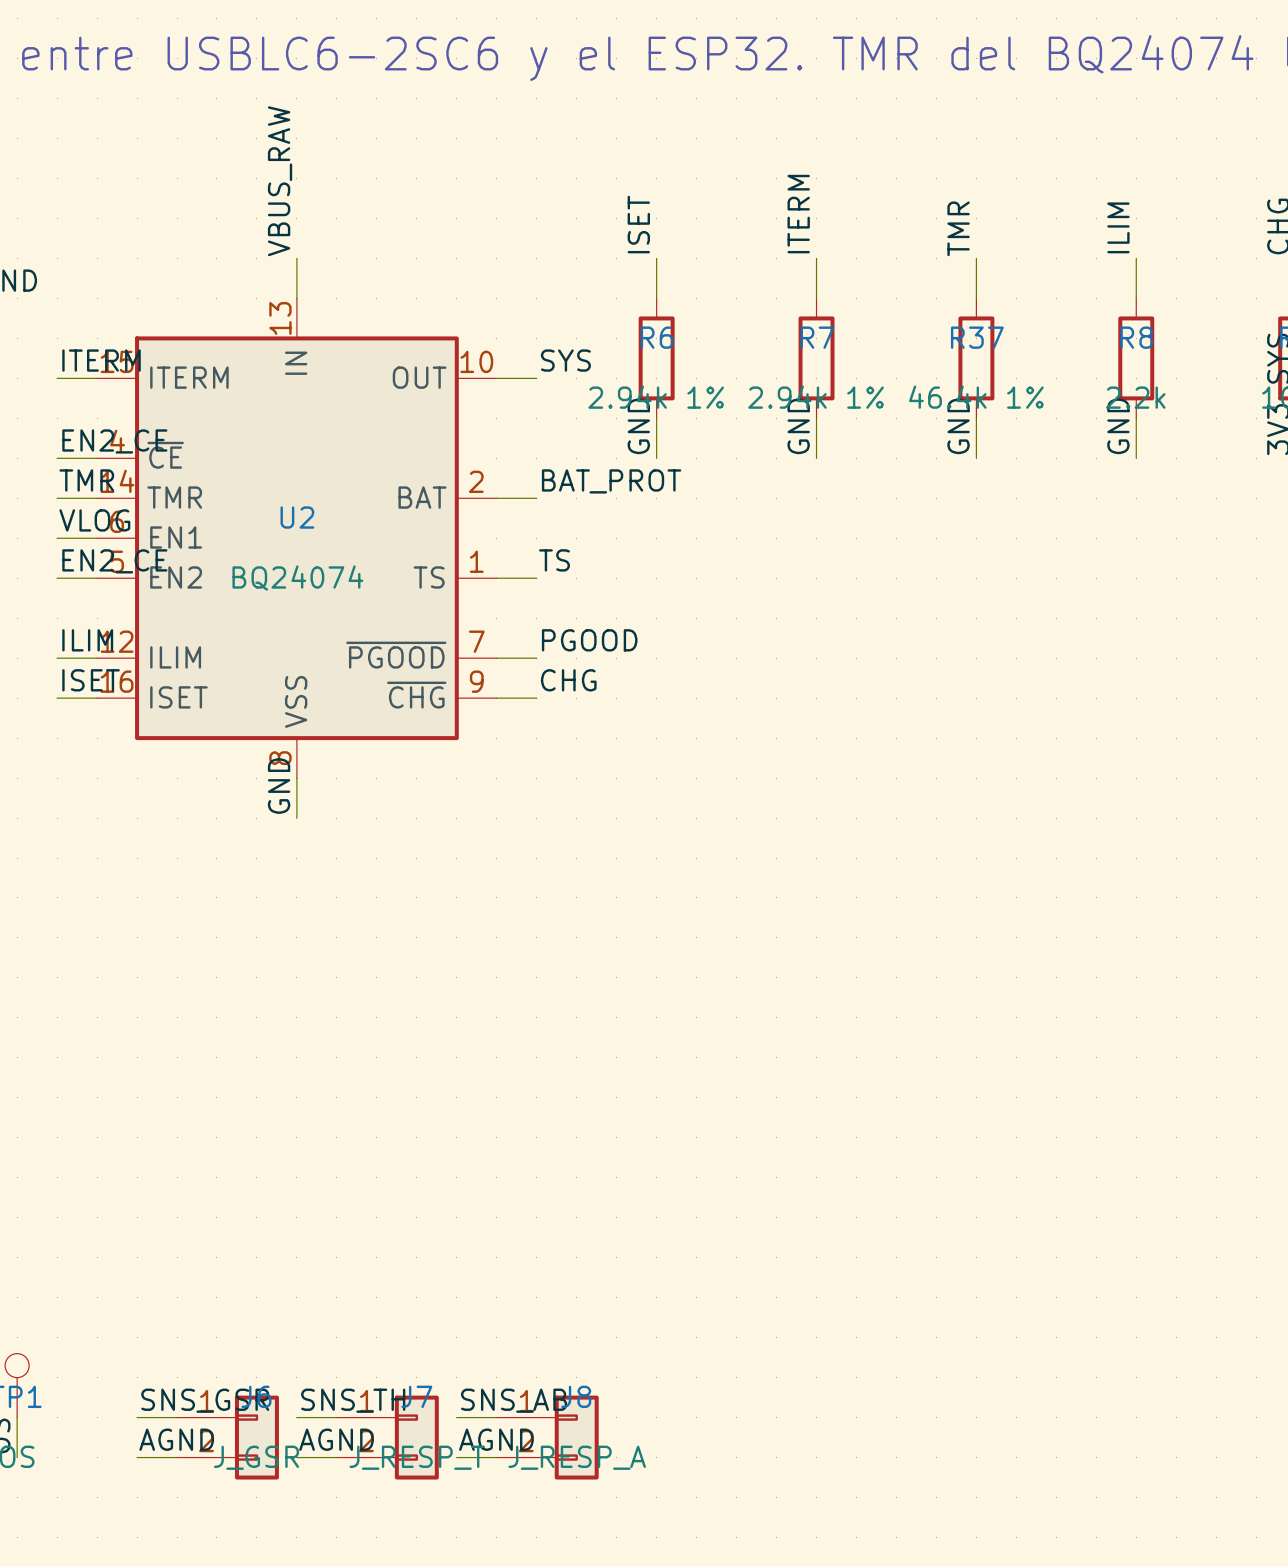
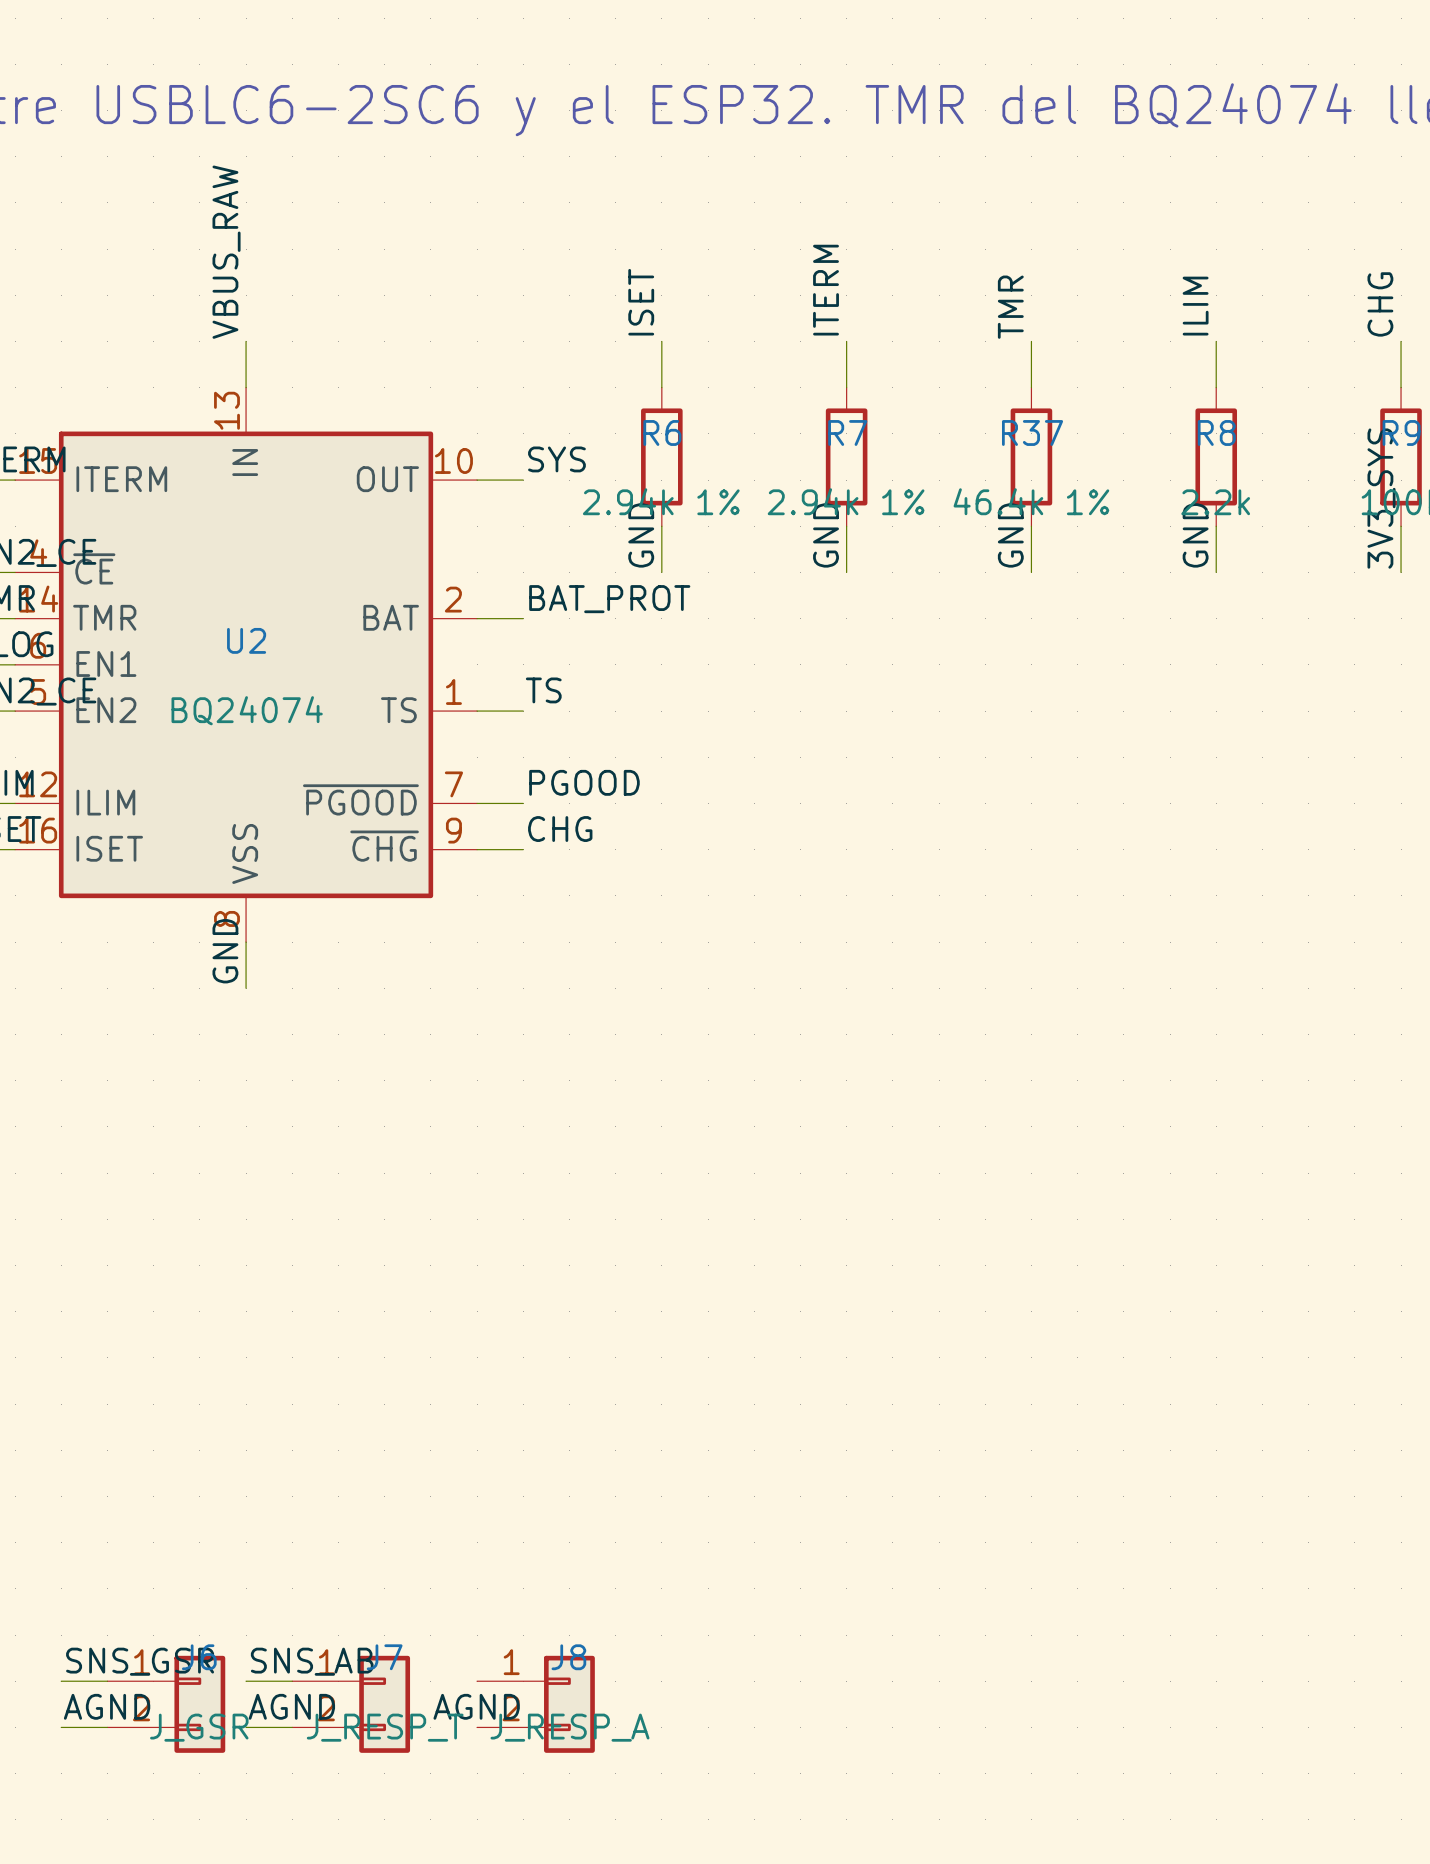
label: SNS_TH (353, 1400) -> SNS_AB (312, 1661)
label: SNS_AB (514, 1400) -> none
wire: (456, 1417) (496, 1417) -> none
wire: (456, 1457) (496, 1457) -> none

